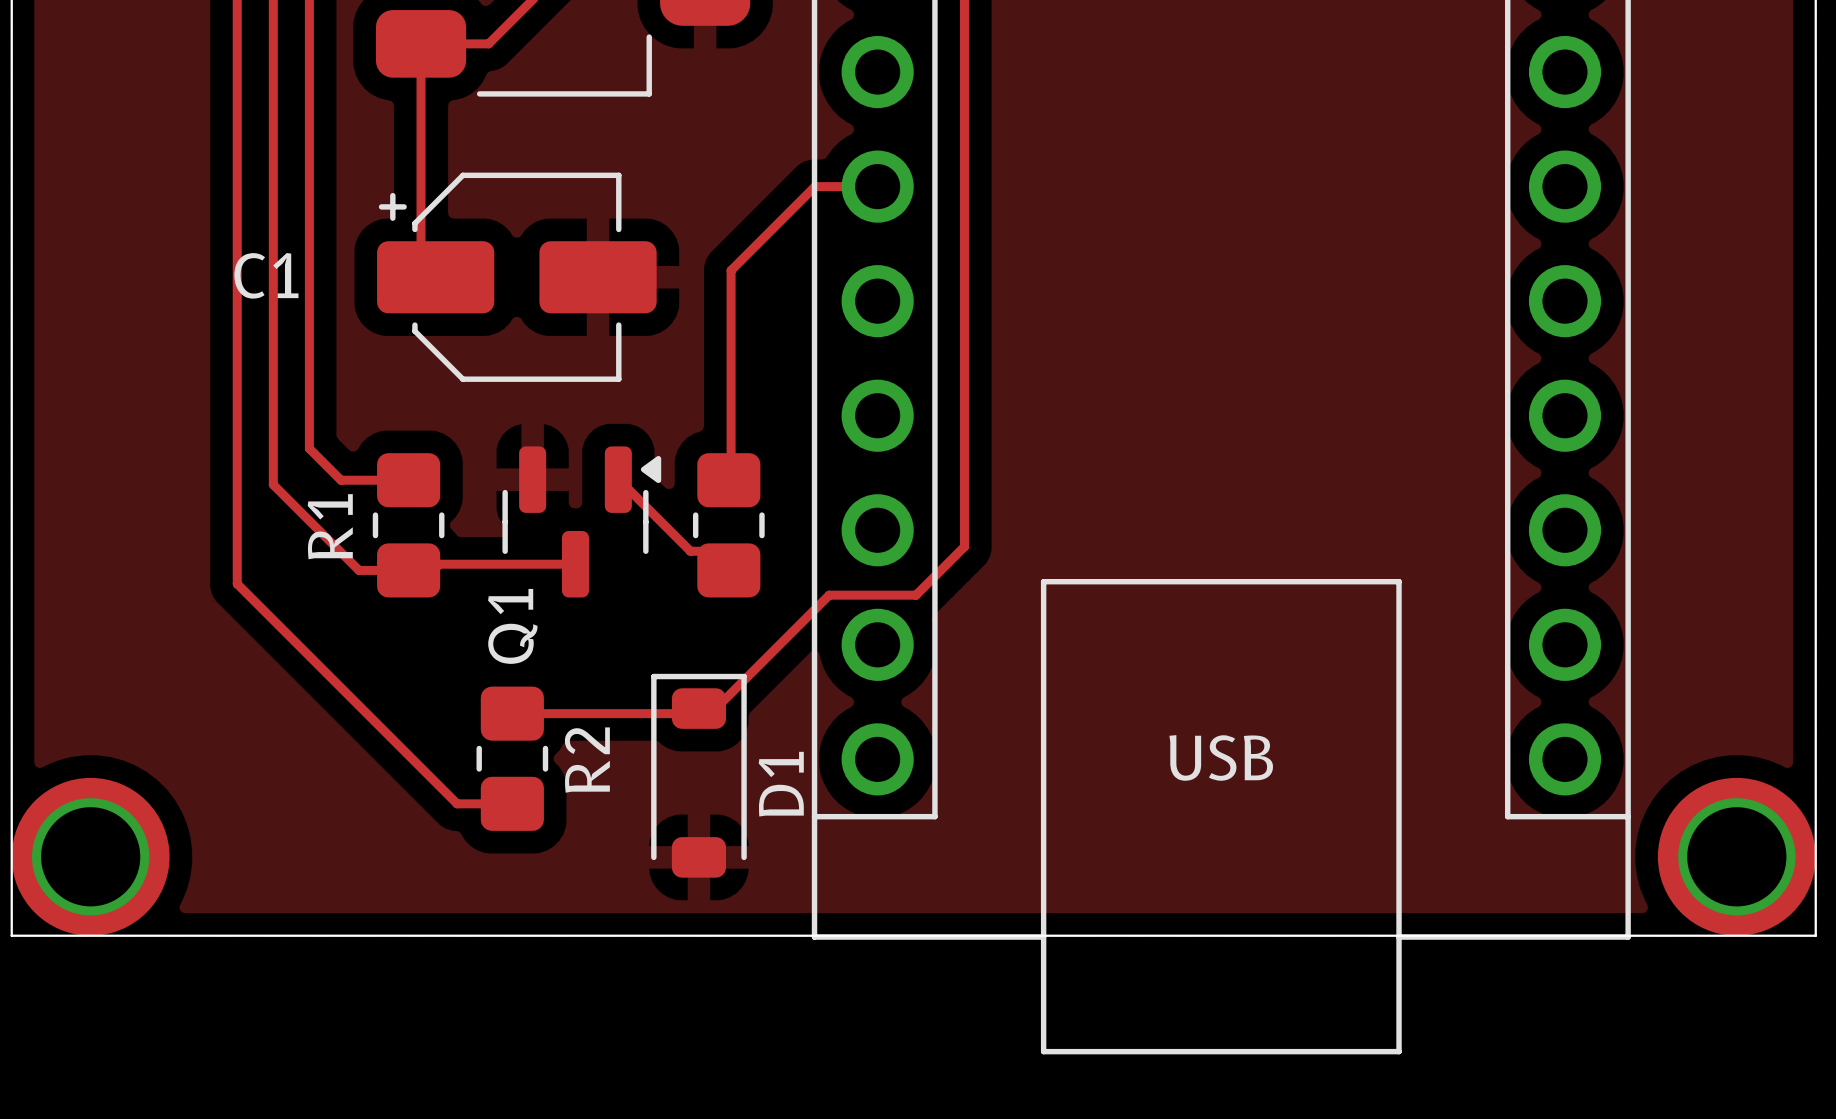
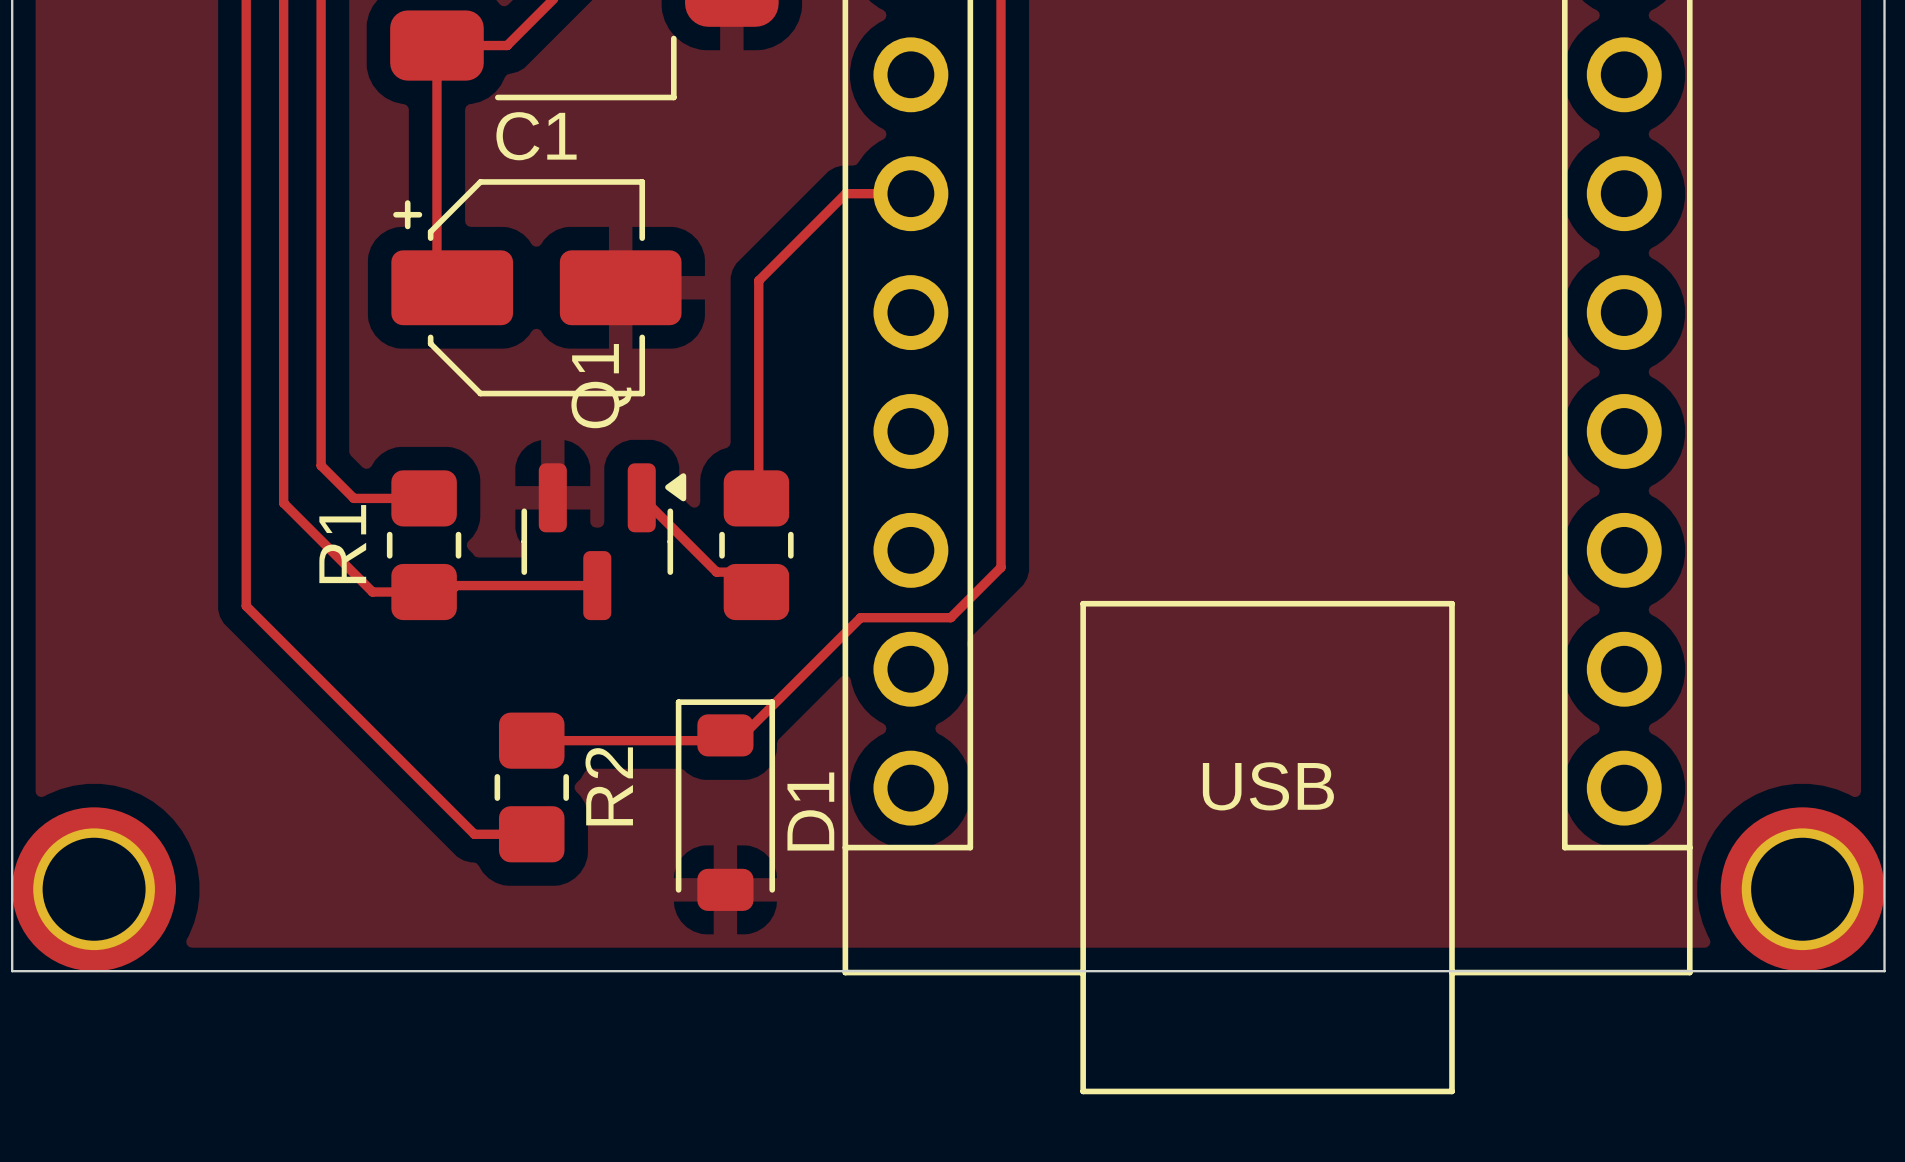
C1 name position: C1 (266, 275) -> C1 (536, 136)
Q1 name position: Q1 (512, 626) -> Q1 (601, 386)

